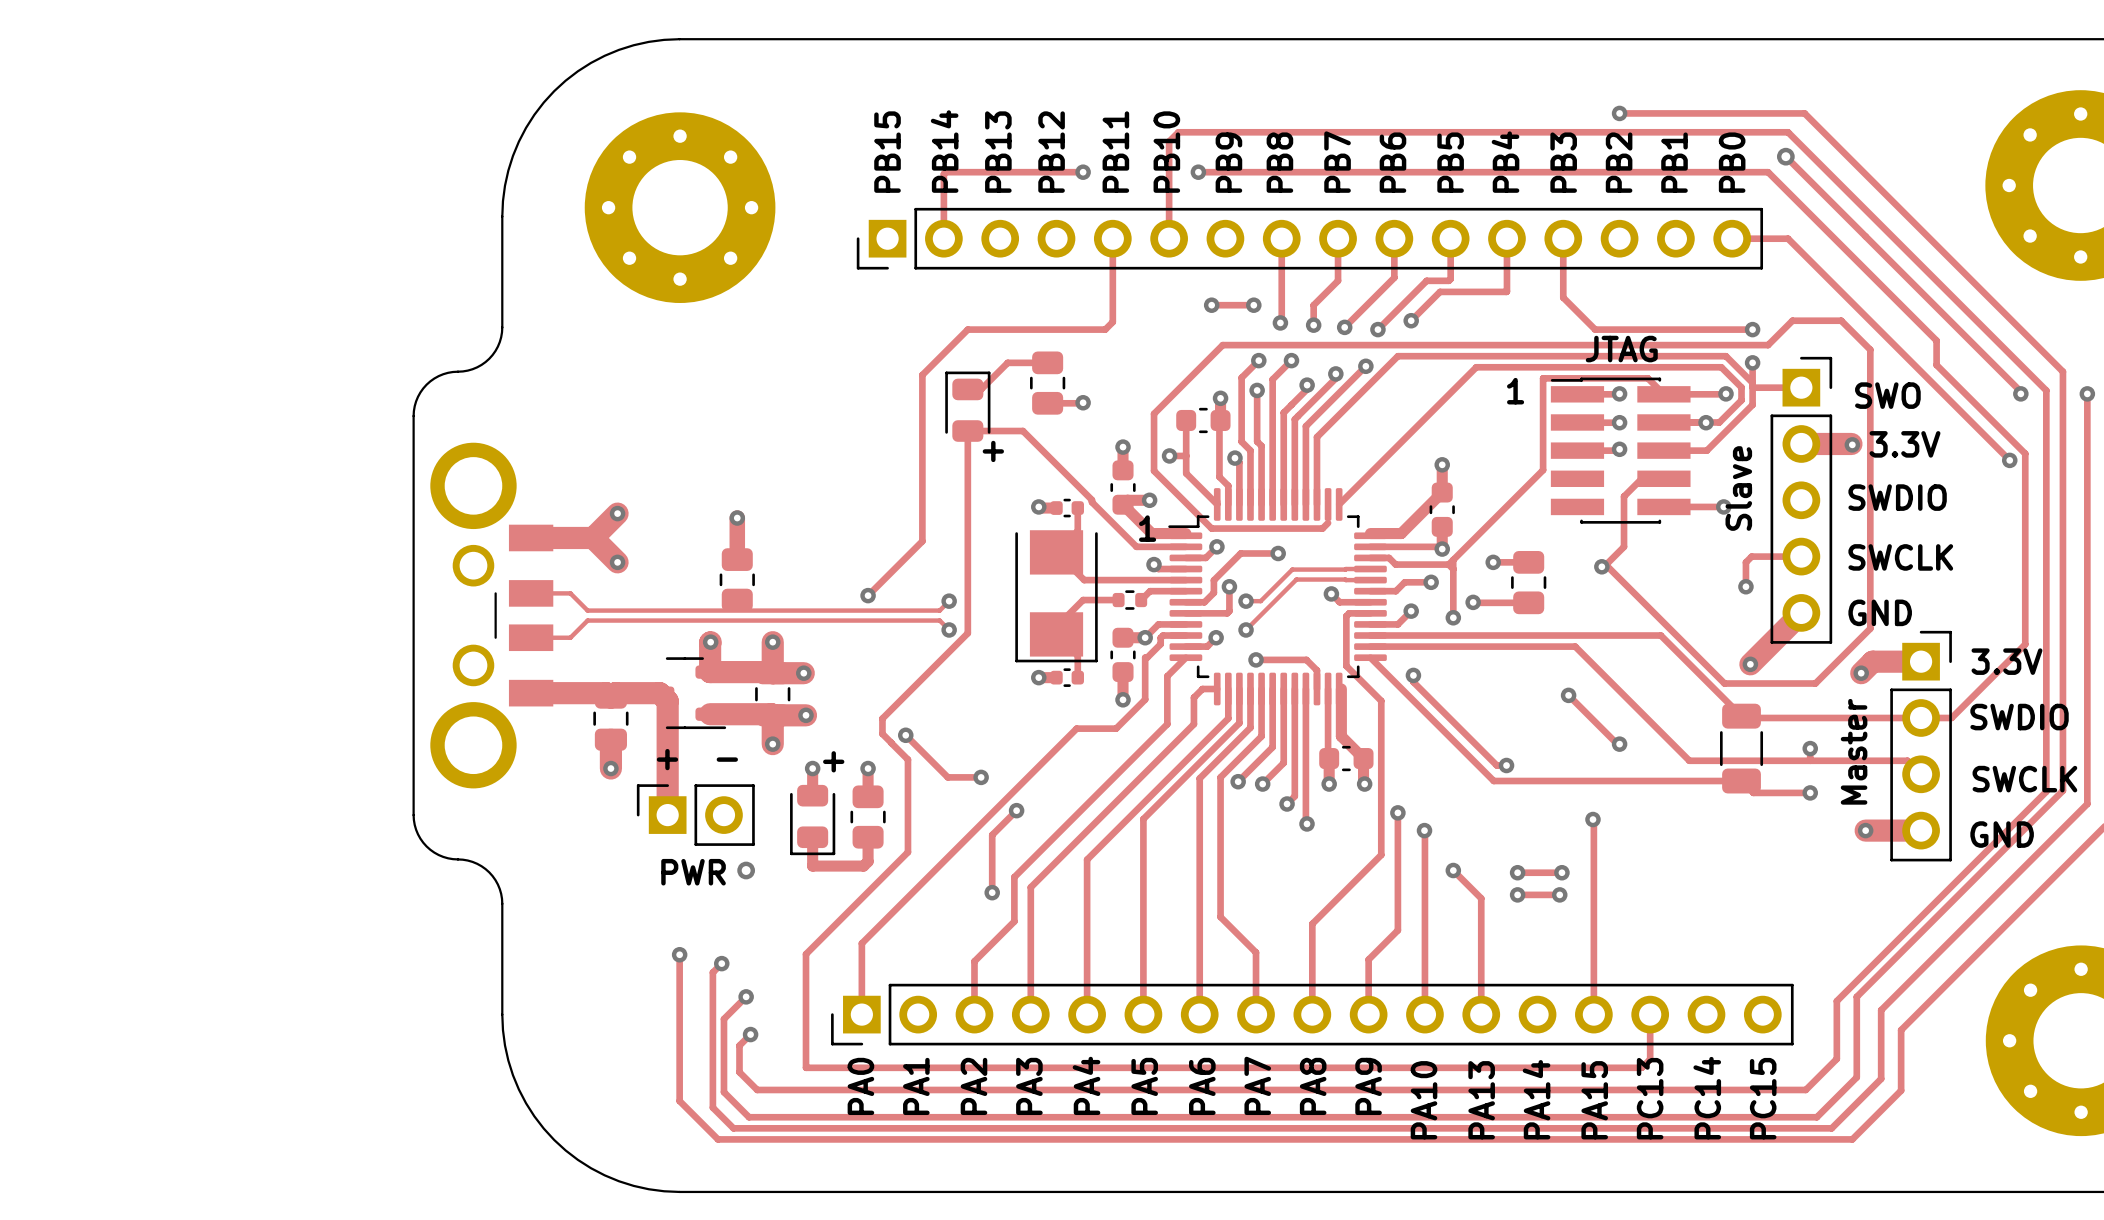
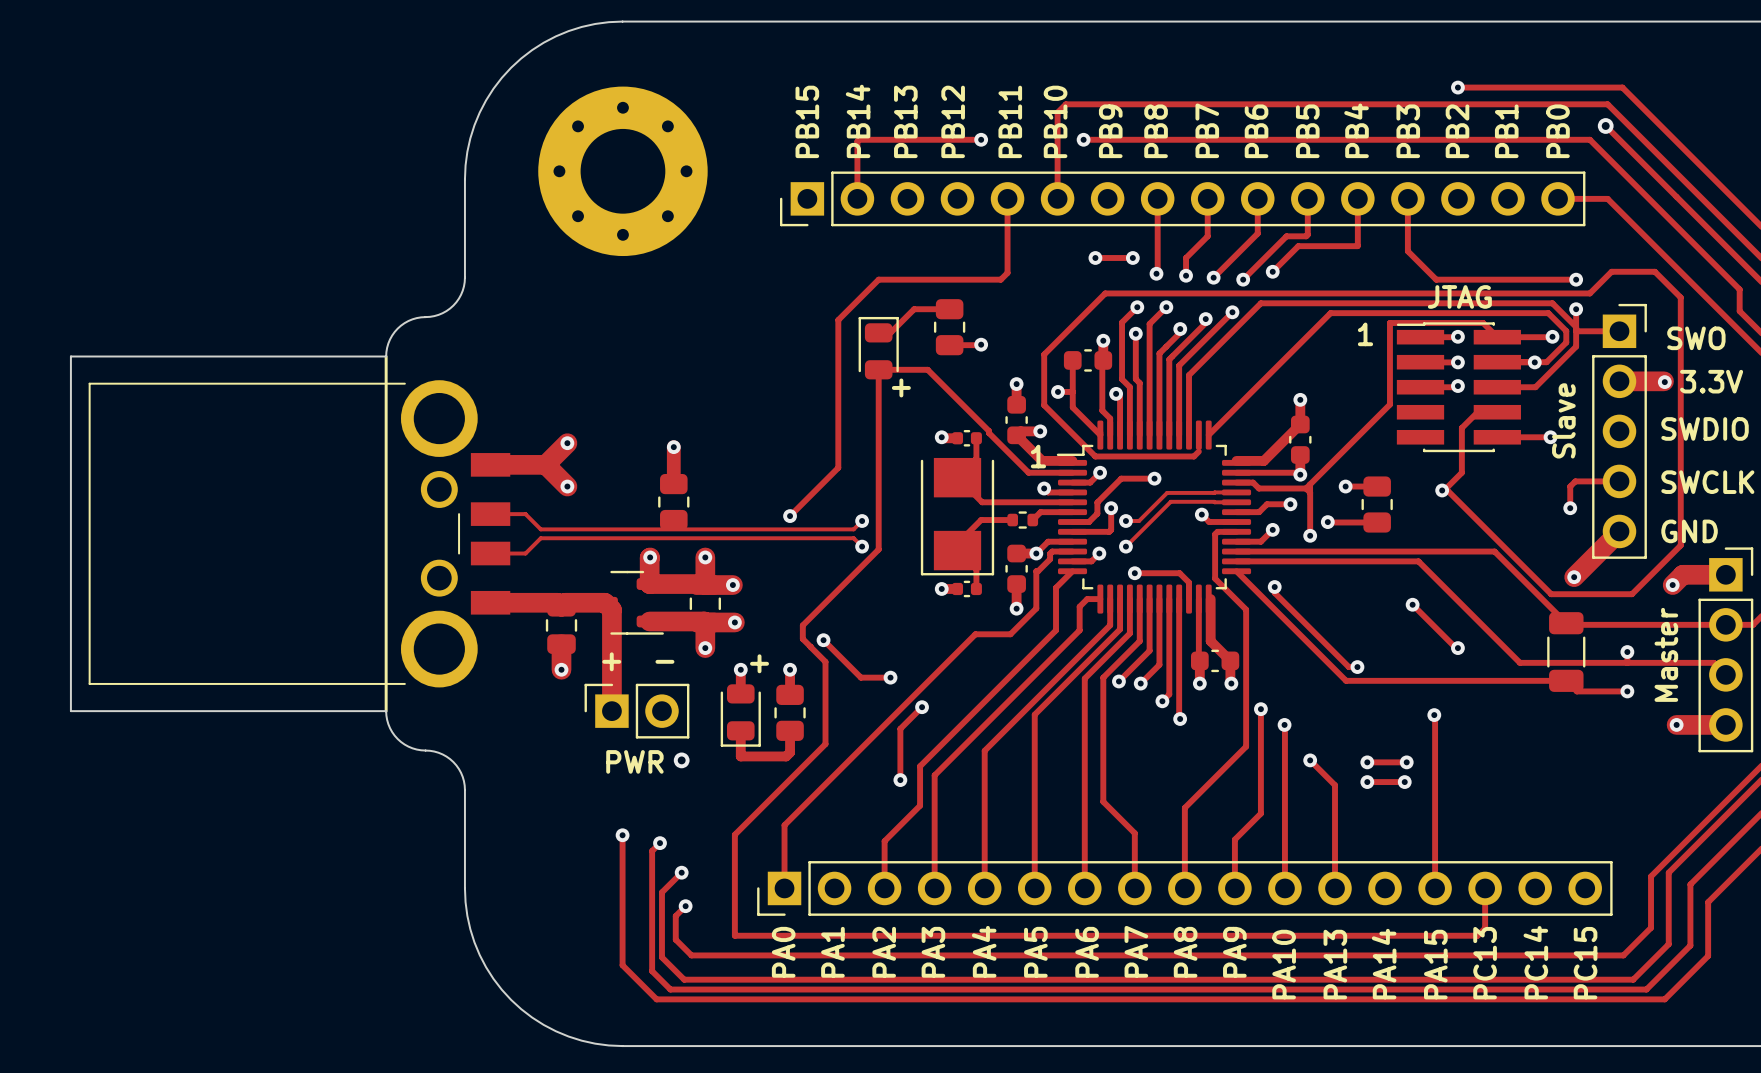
board edge: (413, 416) (413, 815) -> (386, 356) (70, 356) (70, 711) (386, 711)
line: none -> (386, 356) (386, 711)
part: none -> (299, 533)

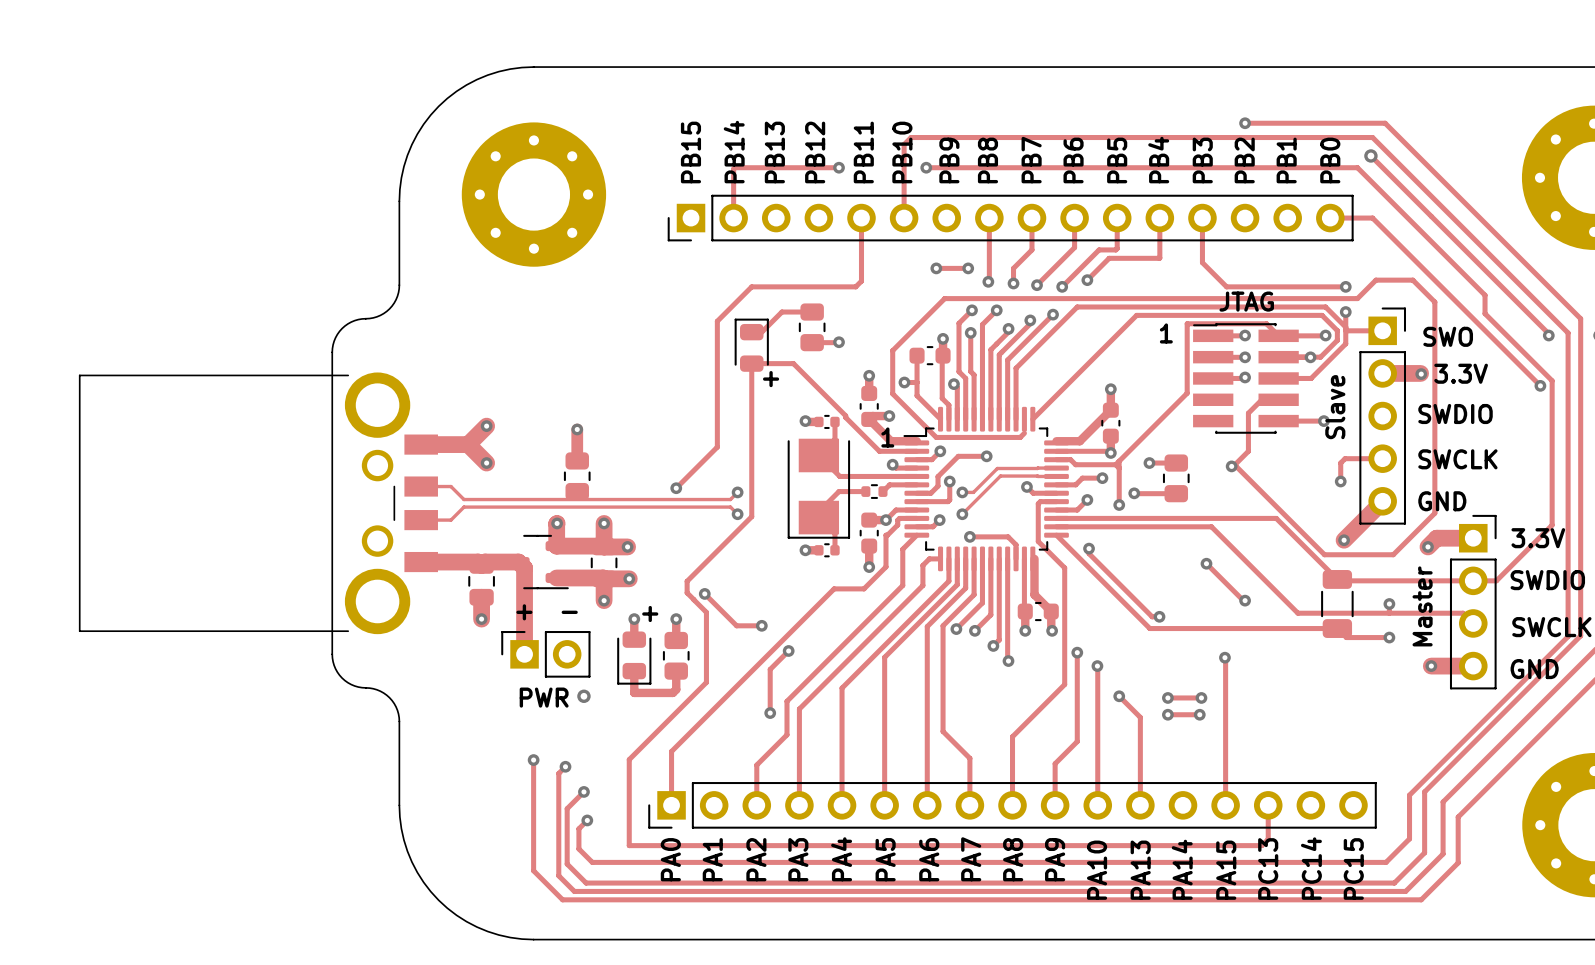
line: (386, 356) (386, 711) -> none
board edge: (386, 356) (70, 356) (70, 711) (386, 711) -> (332, 352) (332, 654)

